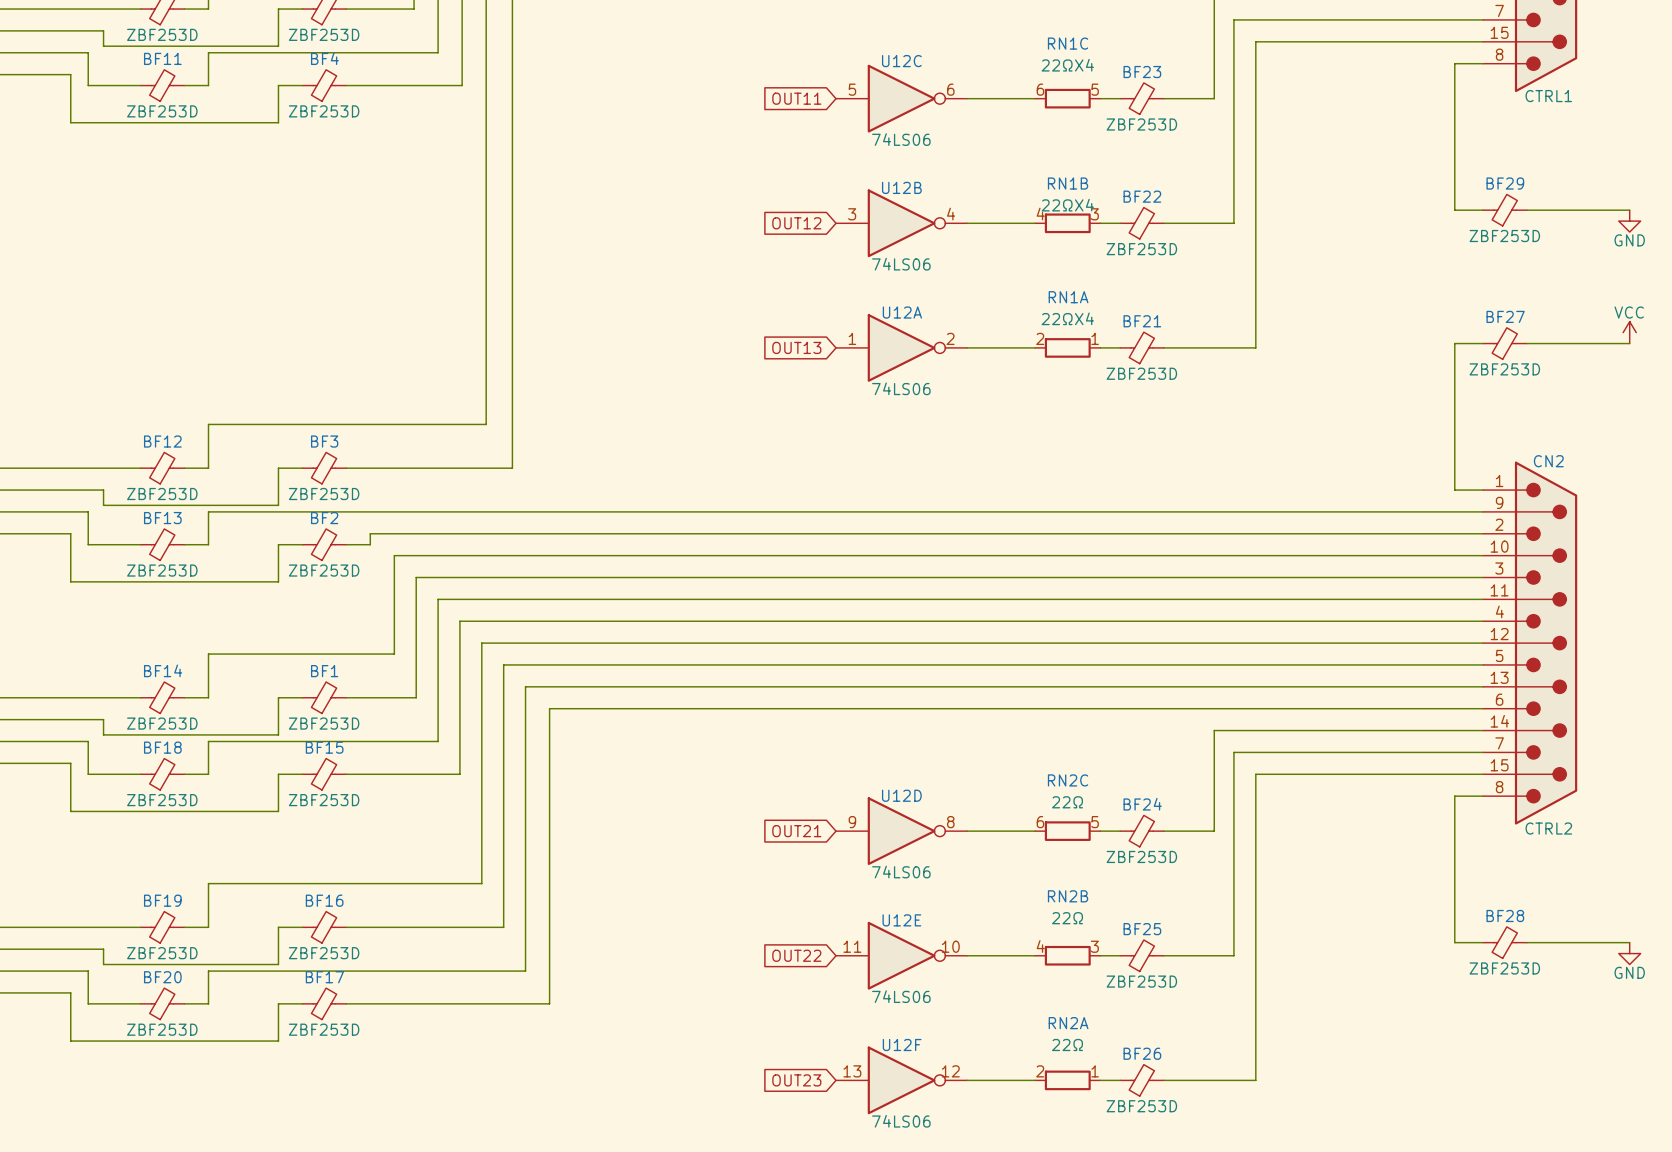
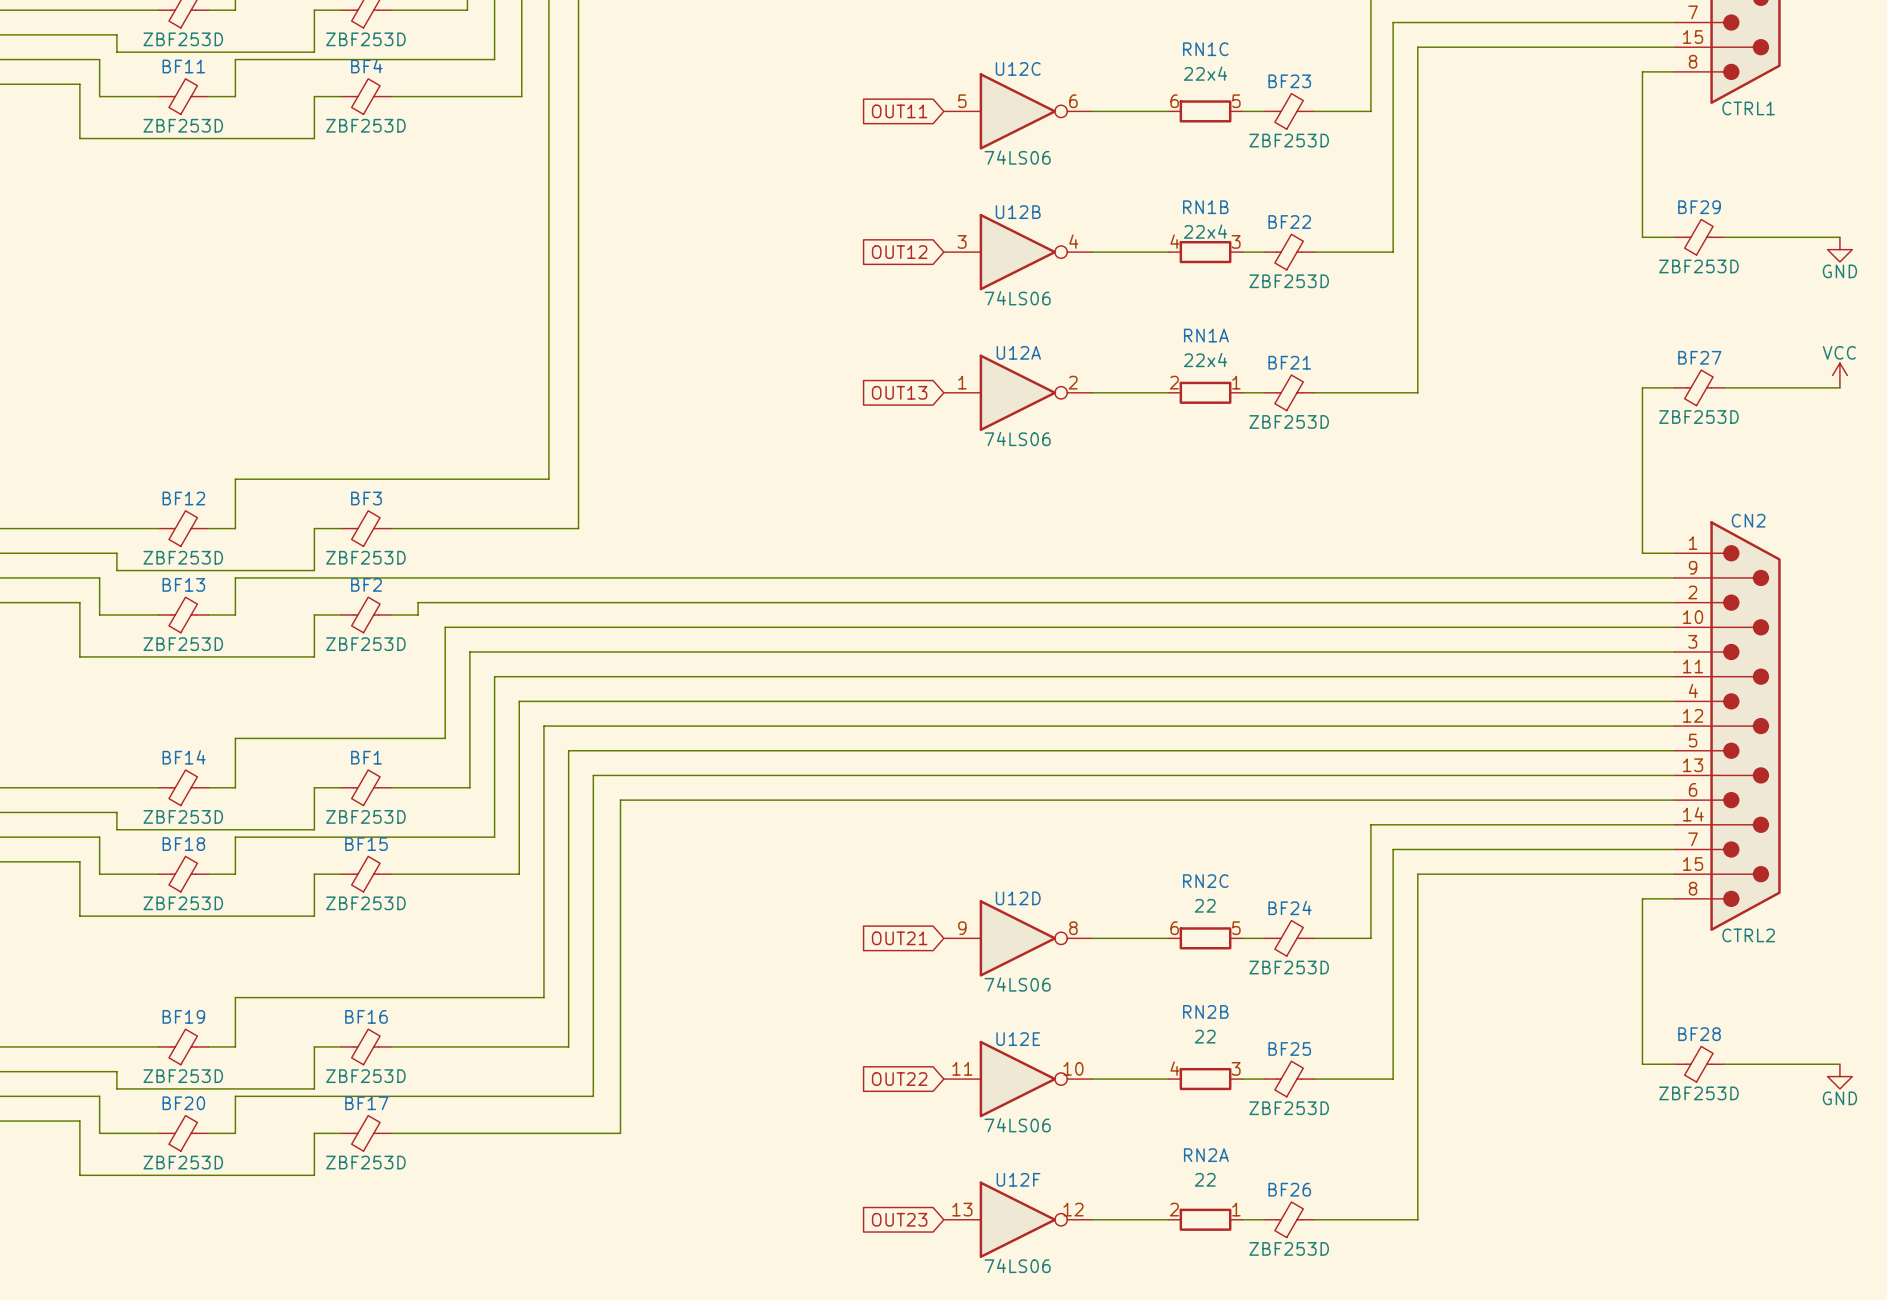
RN1C value: 22ΩX4 (1067, 65) -> 22x4 (1205, 73)
RN1B value: 22ΩX4 (1067, 205) -> 22x4 (1205, 231)
RN1A value: 22ΩX4 (1067, 318) -> 22x4 (1205, 359)
RN2C value: 22Ω (1067, 802) -> 22 (1205, 905)
RN2B value: 22Ω (1067, 918) -> 22 (1205, 1036)
RN2A value: 22Ω (1067, 1045) -> 22 (1205, 1179)

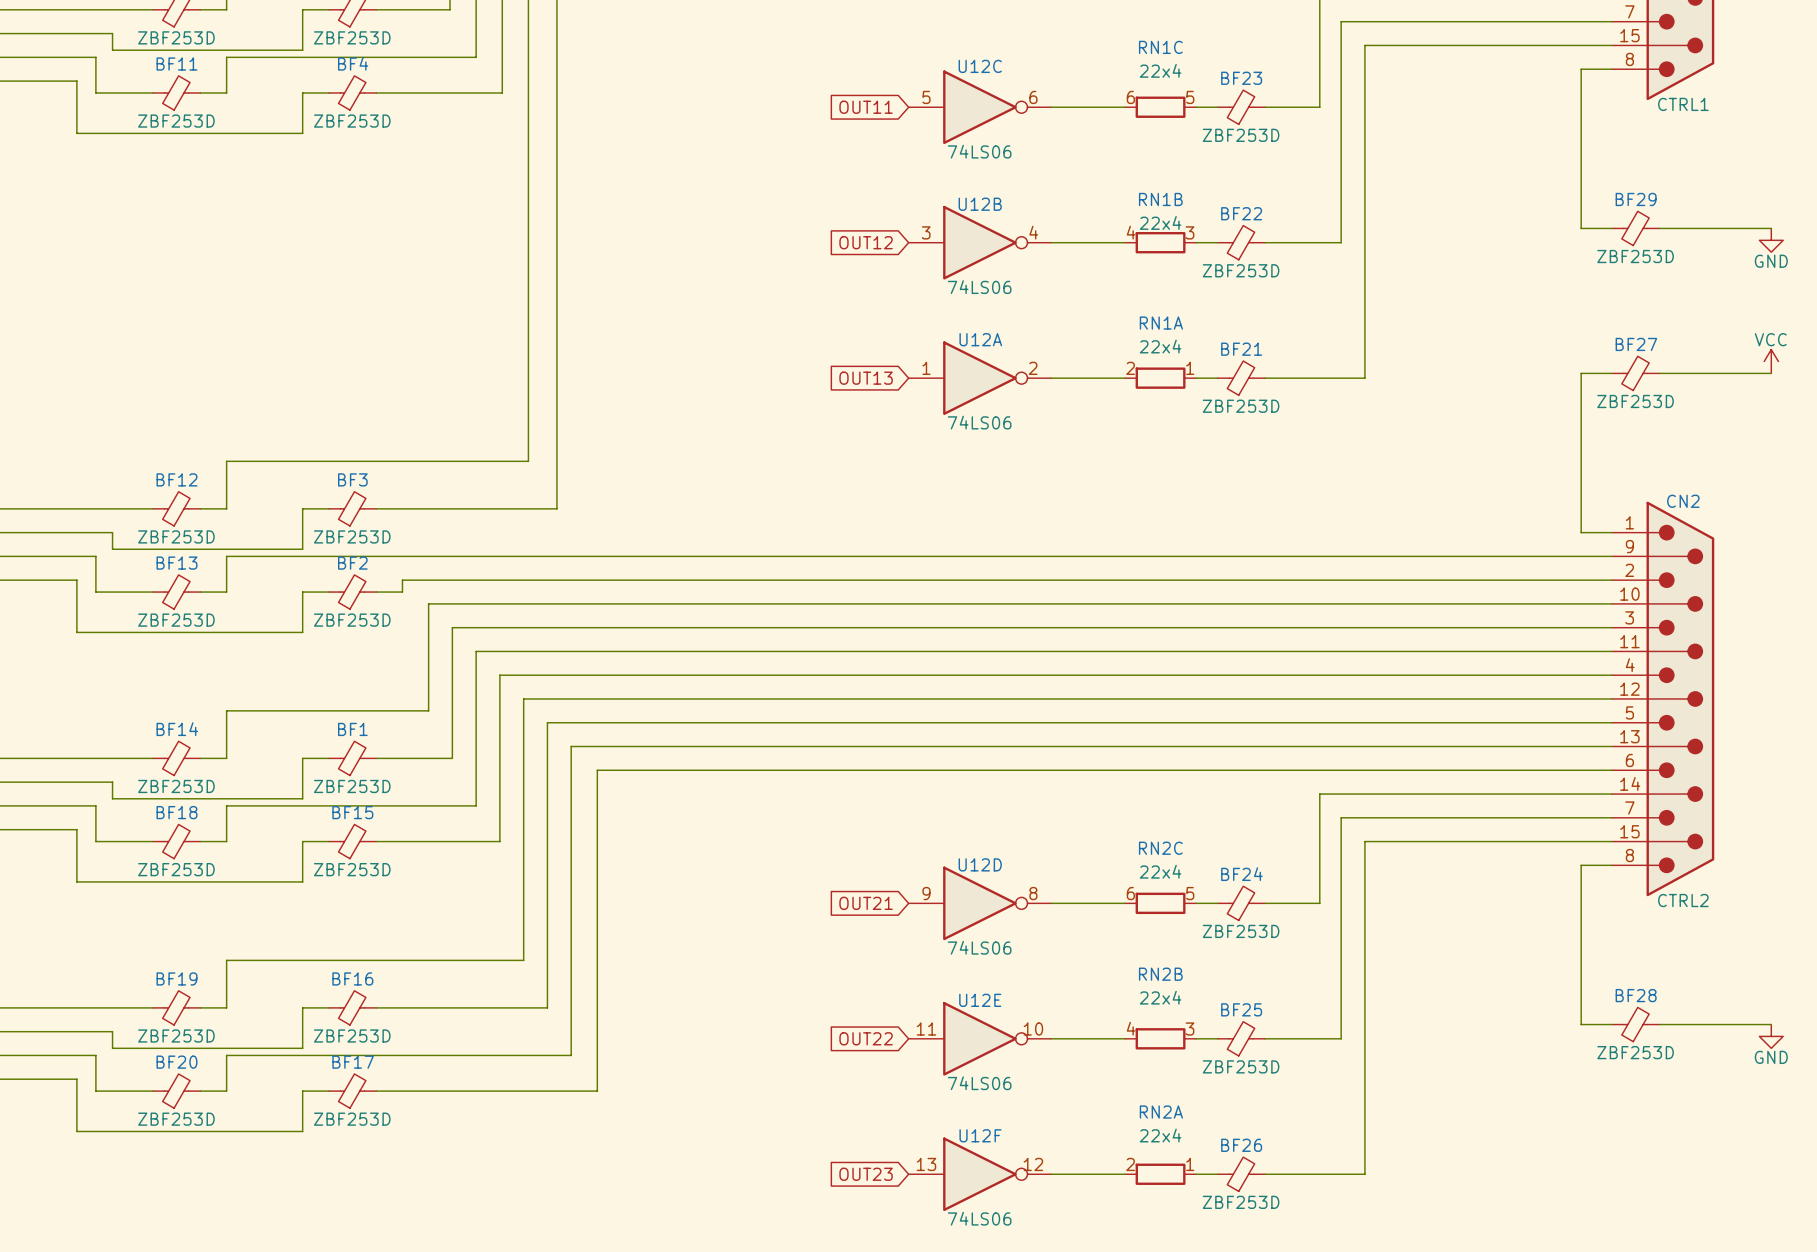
RN2C value: 22 (1205, 905) -> 22x4 (1160, 871)
RN2B value: 22 (1205, 1036) -> 22x4 (1160, 997)
RN2A value: 22 (1205, 1179) -> 22x4 (1160, 1135)

